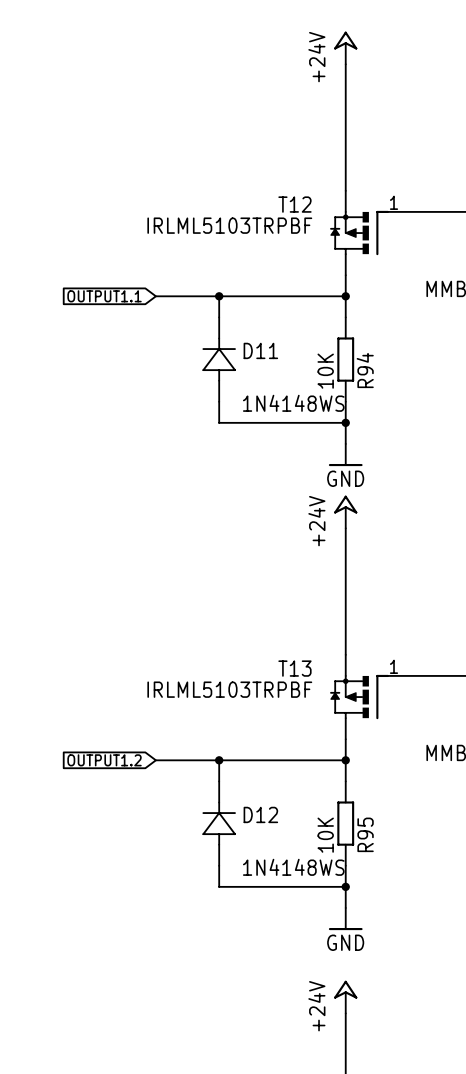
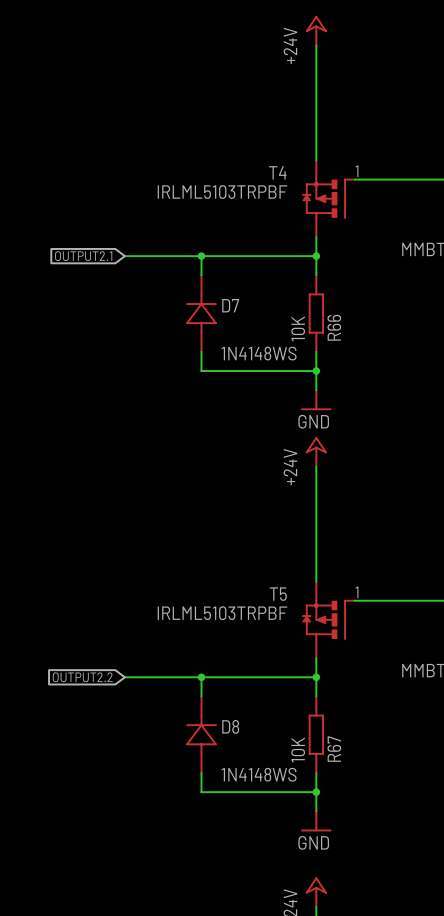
T12 name: T12 (294, 204) -> T4 (277, 172)
global label: OUTPUT1.1 (104, 296) -> OUTPUT2.1 (83, 256)
wire: none -> (124, 256) (144, 256)
D11 name: D11 (260, 350) -> D7 (230, 305)
R94 name: R94 (365, 370) -> R66 (334, 327)
T13 name: T13 (294, 668) -> T5 (278, 594)
global label: OUTPUT1.2 (104, 760) -> OUTPUT2.2 (82, 677)
wire: none -> (124, 677) (144, 677)
D12 name: D12 (260, 814) -> D8 (230, 726)
R95 name: R95 (365, 834) -> R67 (334, 749)

